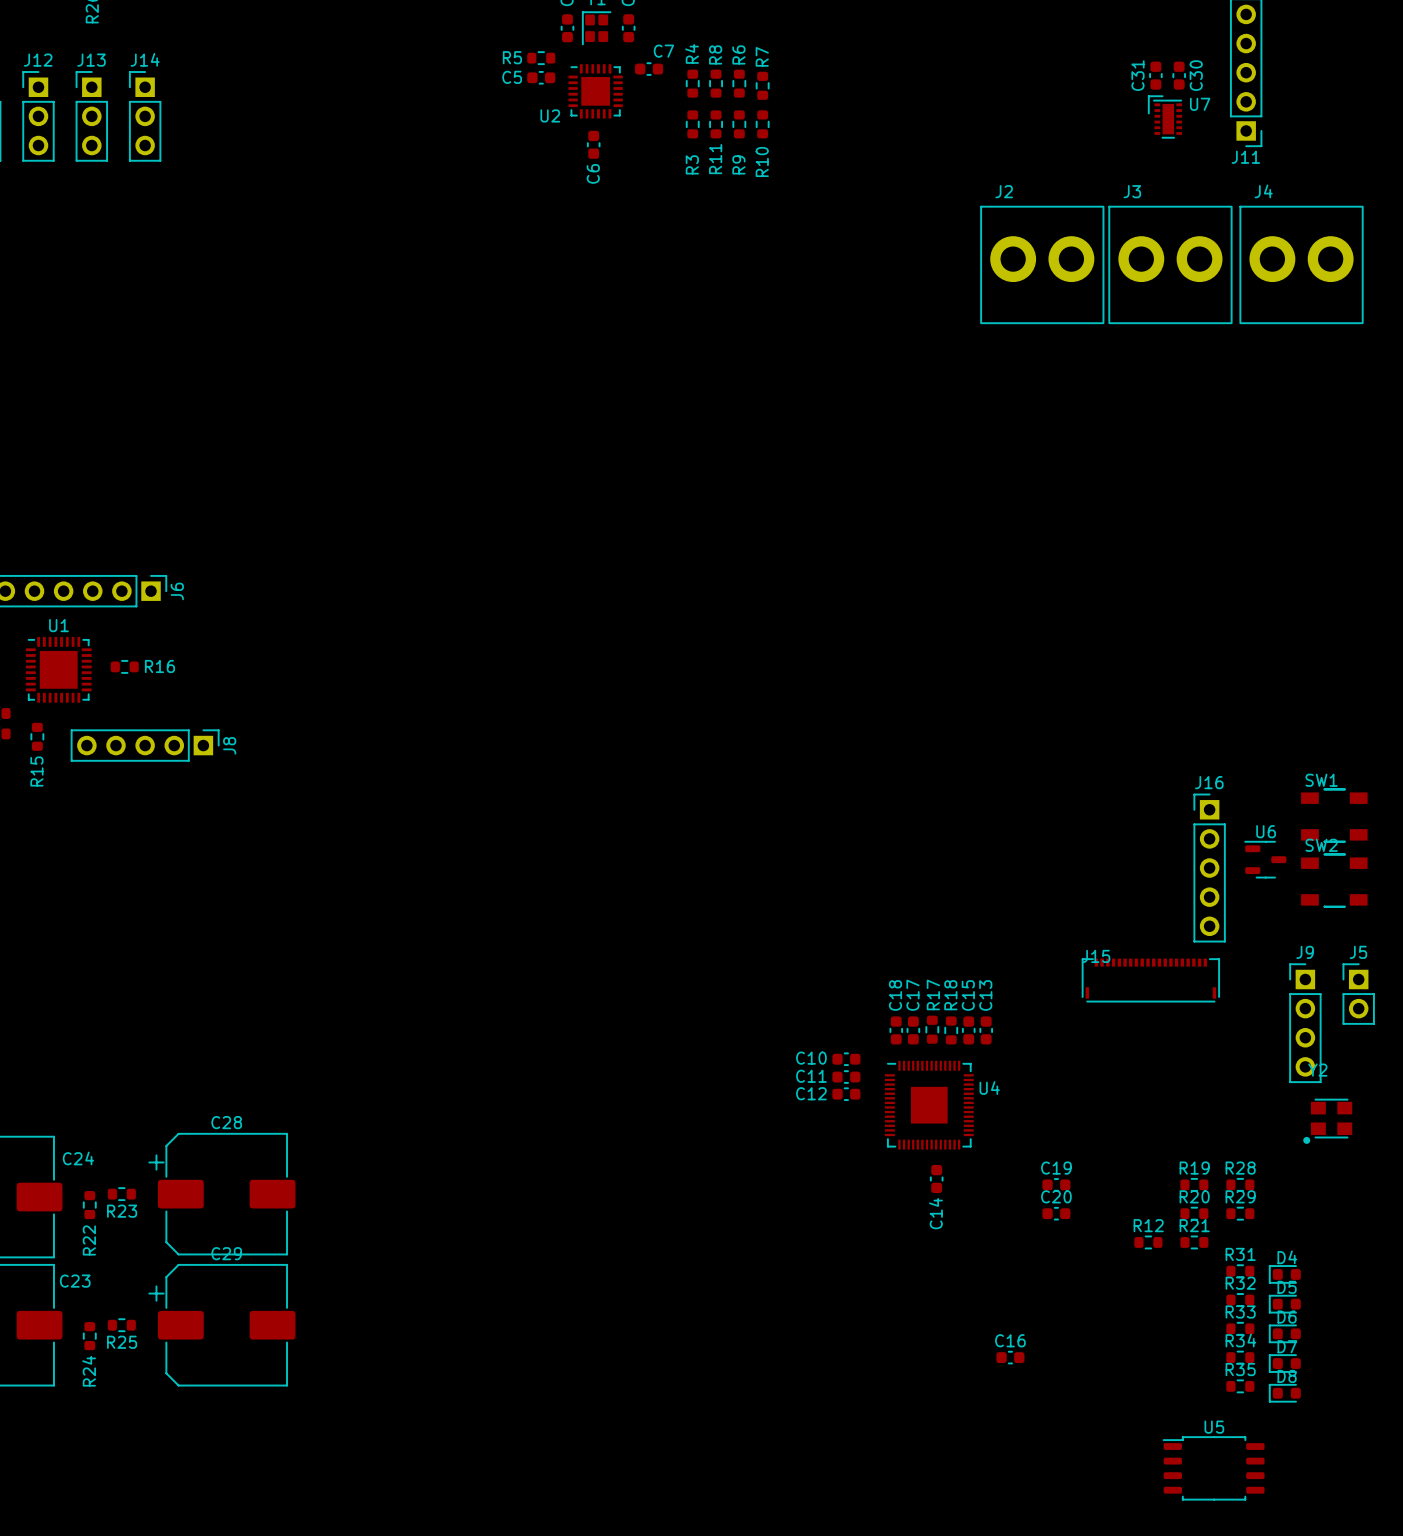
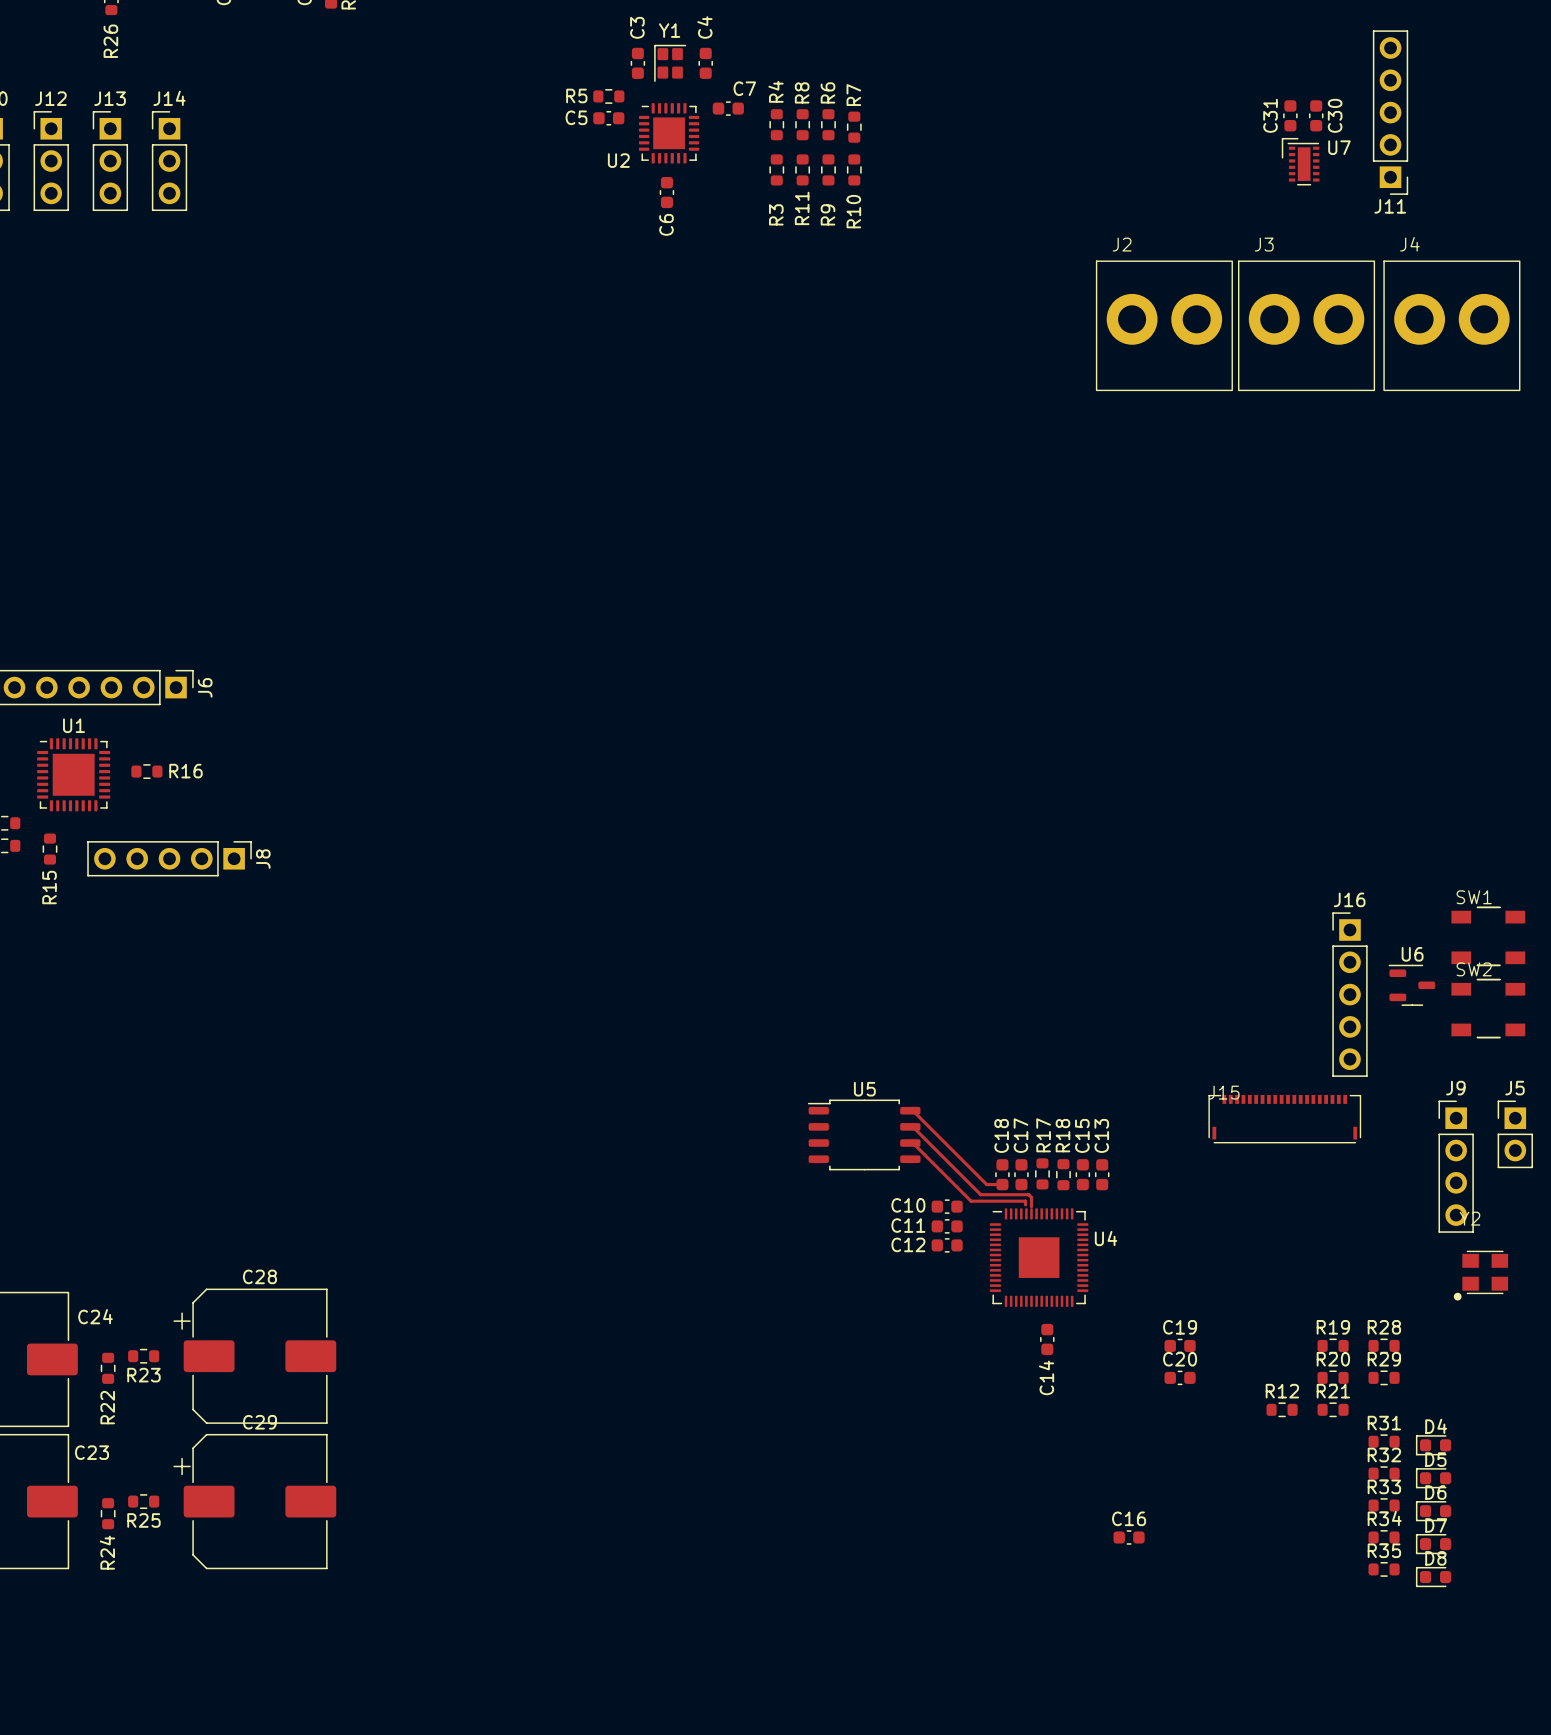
track: none -> (910, 1110) (912, 1110) (986, 1184) (1002, 1184)
track: none -> (910, 1126) (912, 1126) (980, 1194) (1028, 1194) (1031, 1197) (1031, 1206)
track: none -> (910, 1143) (912, 1143) (971, 1201) (1025, 1201) (1025, 1204)
U5 position: (1213, 1468) -> (864, 1134)

